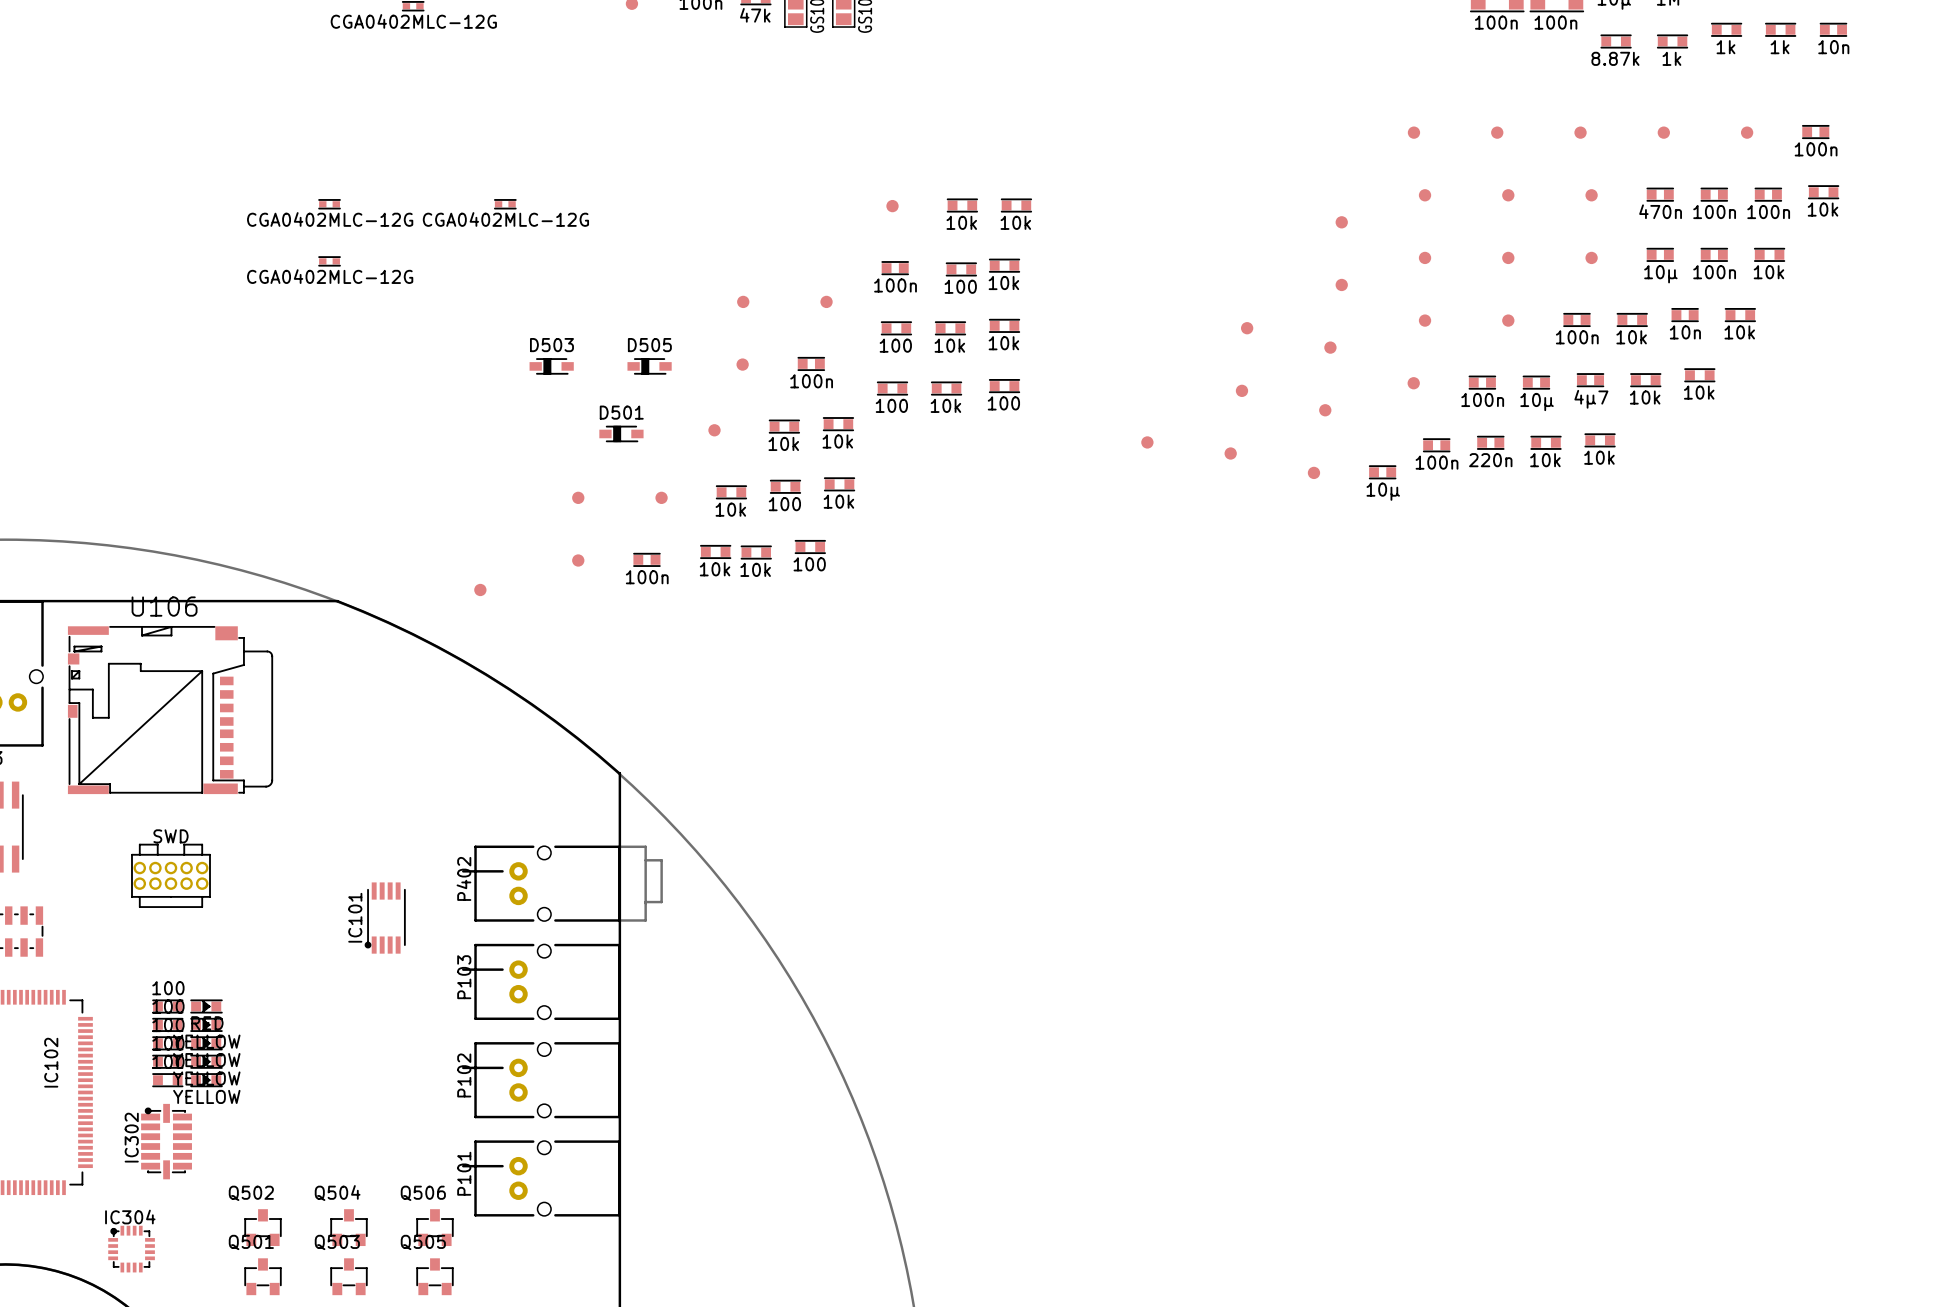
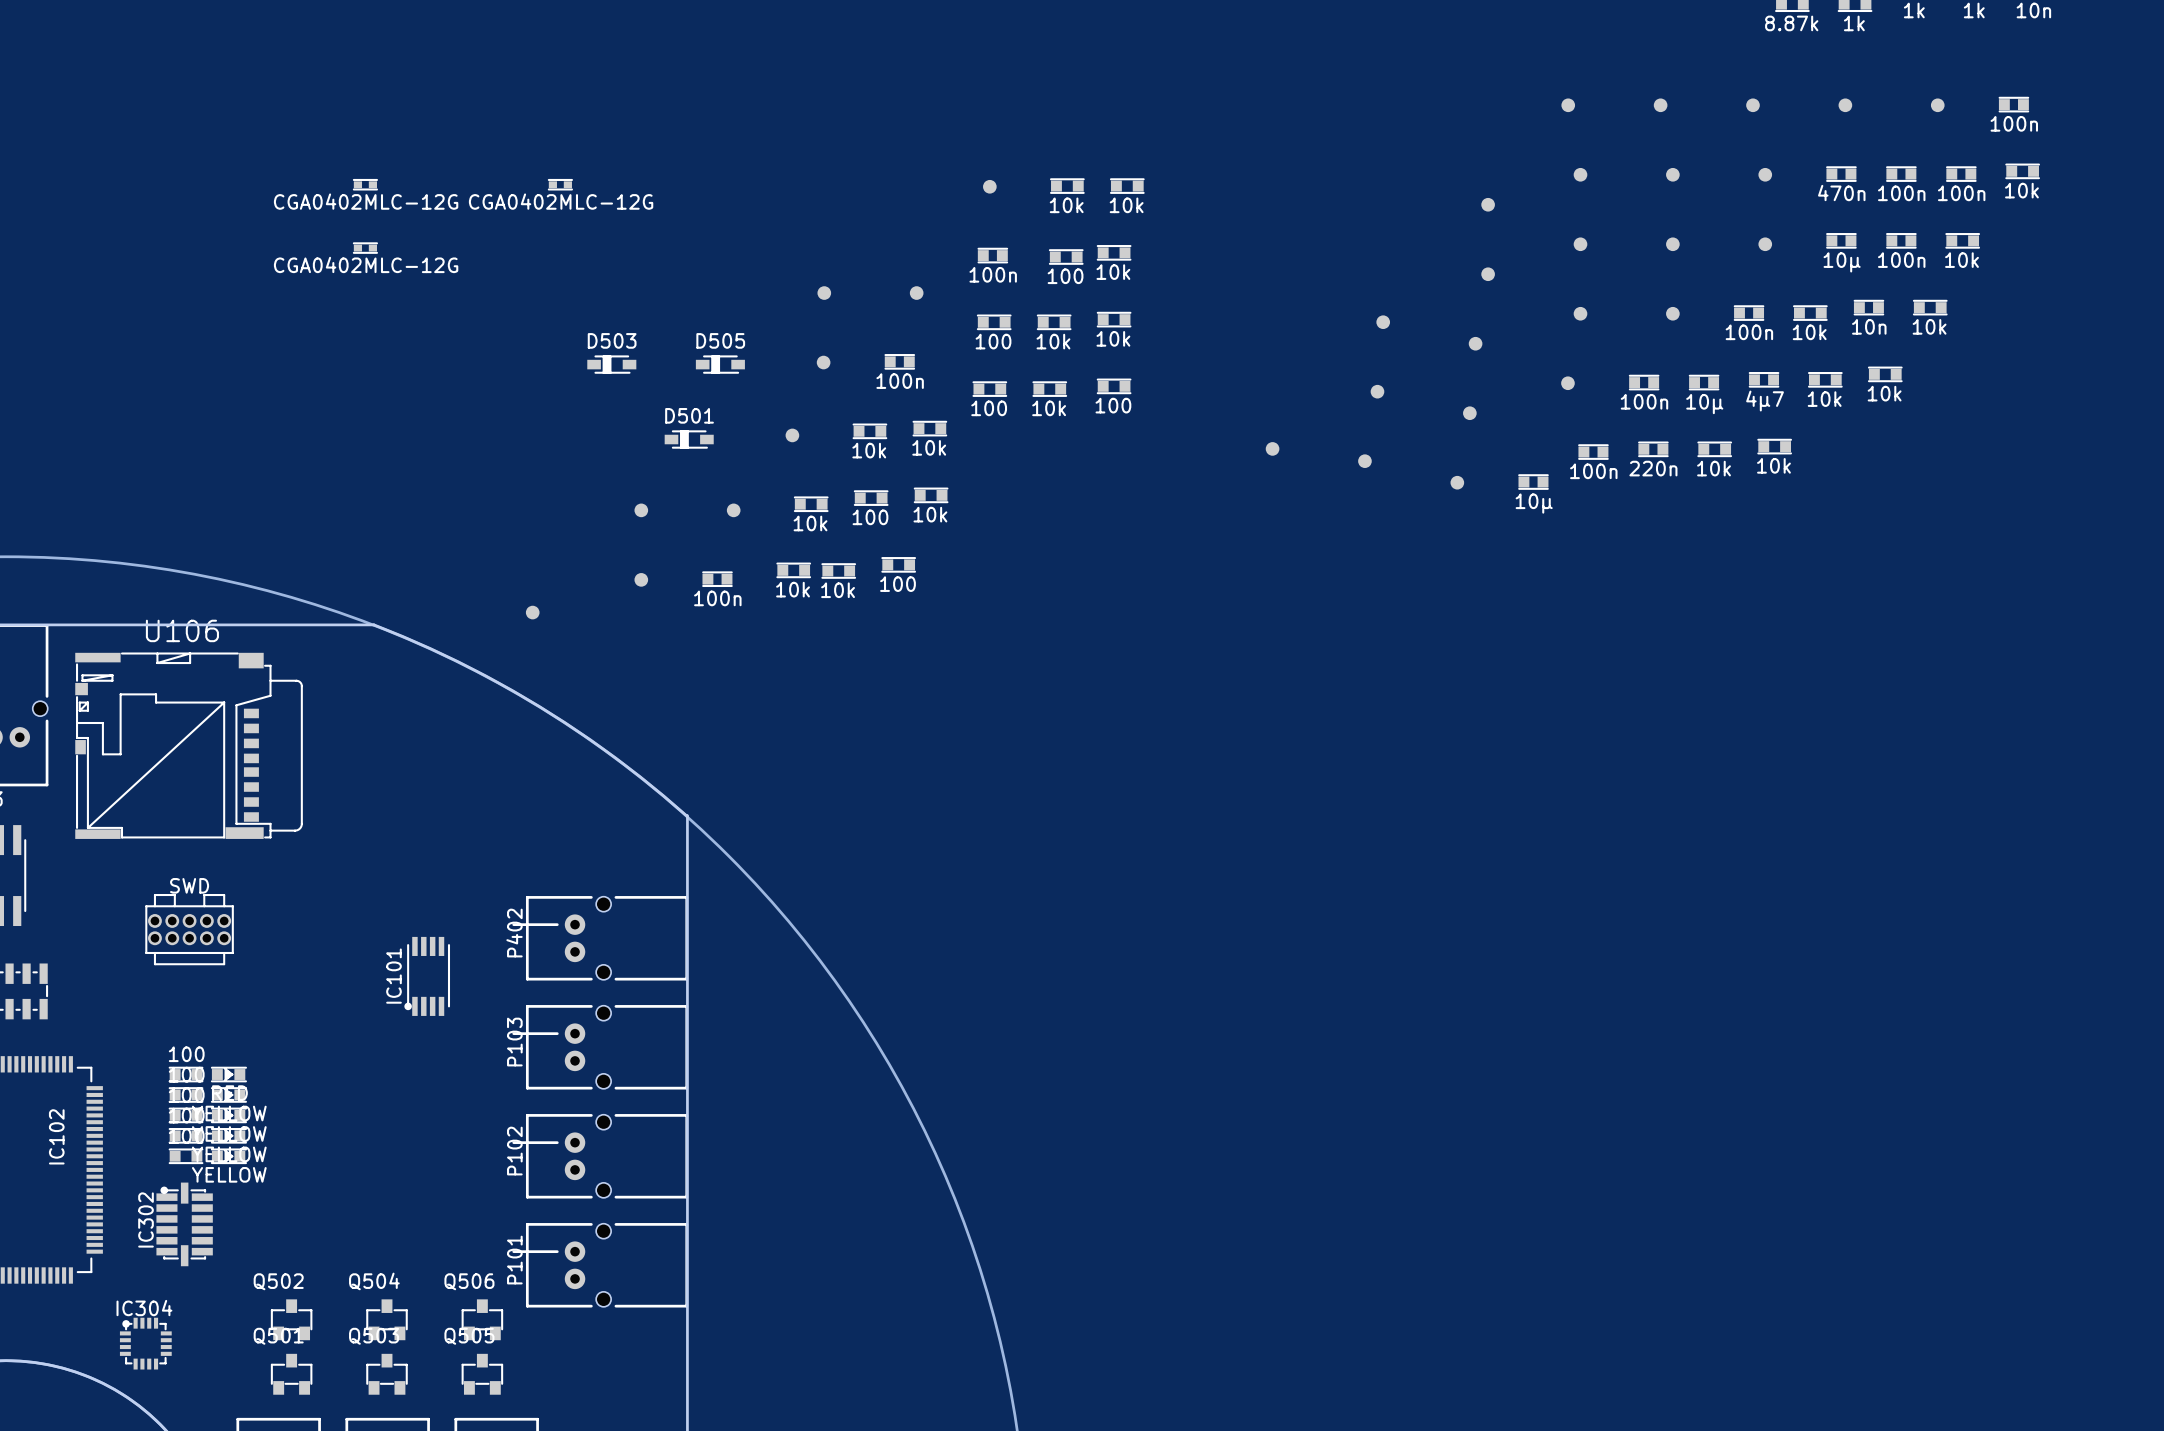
line: (619, 846) (645, 846) (645, 920) (619, 920) -> none
line: (645, 860) (661, 860) (661, 902) (645, 902) -> none

